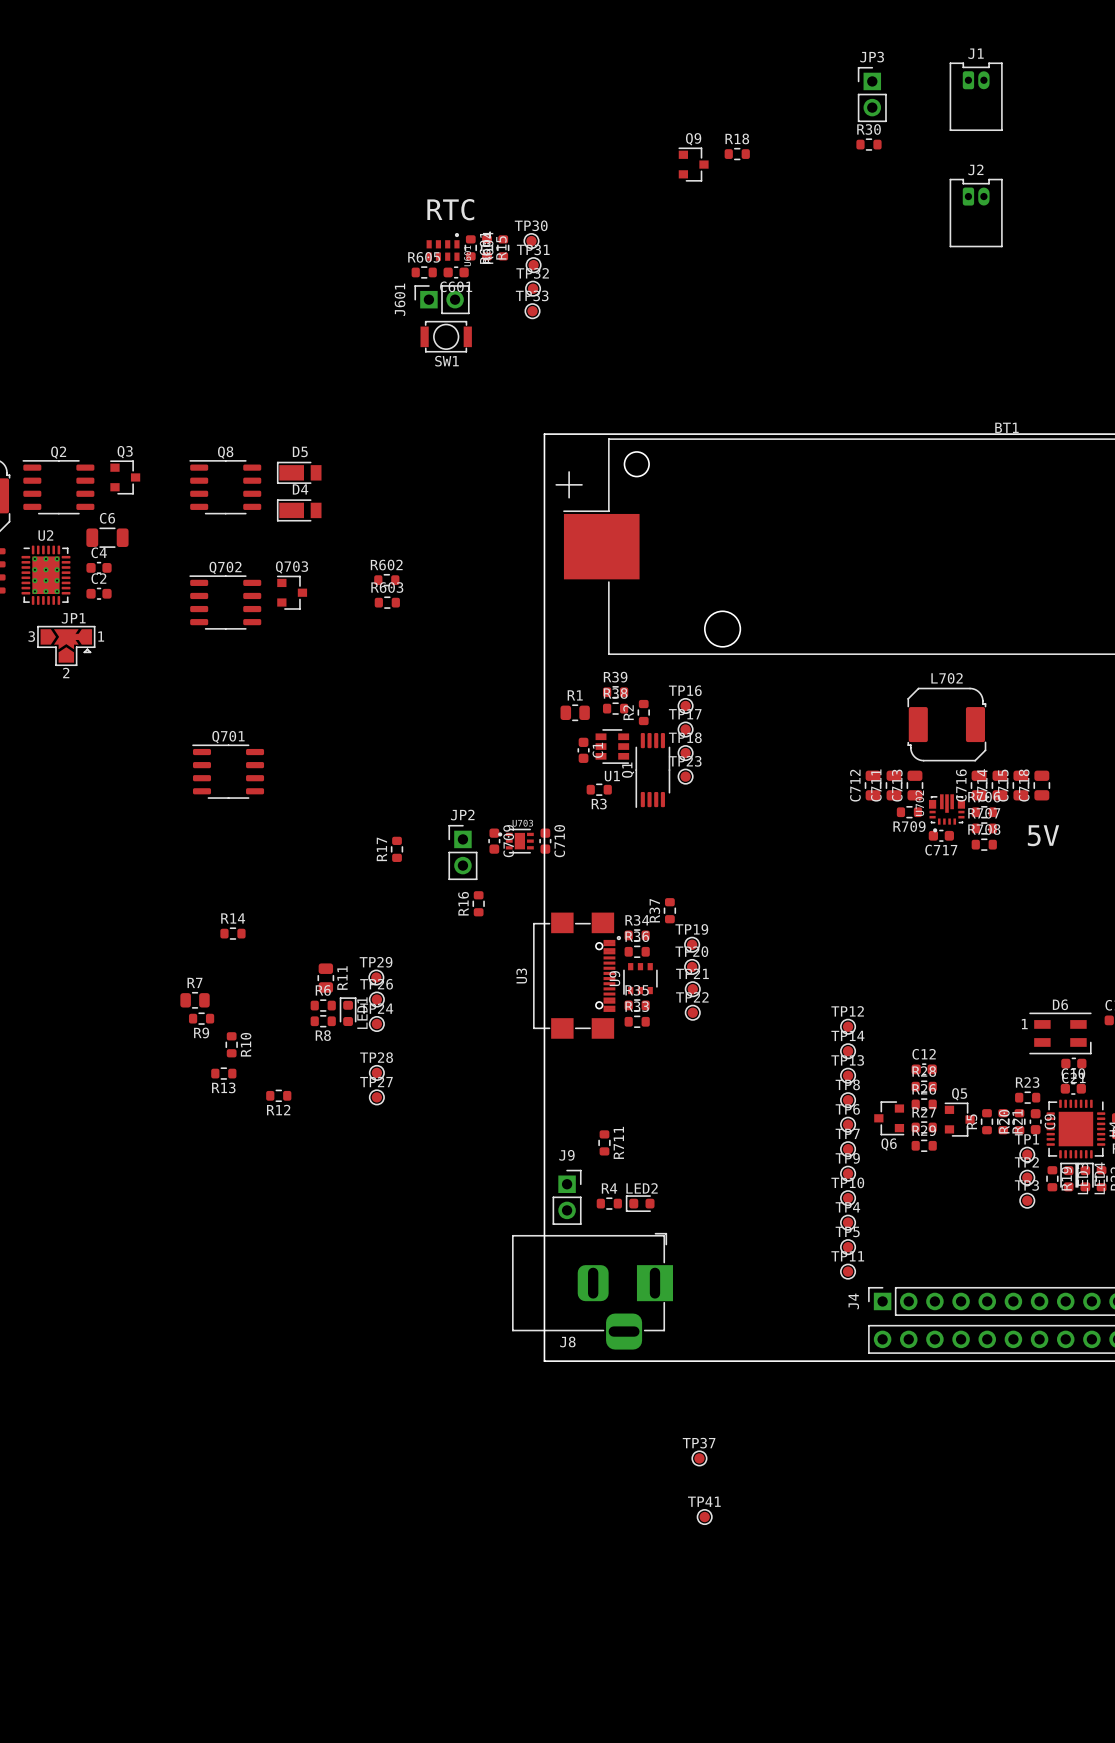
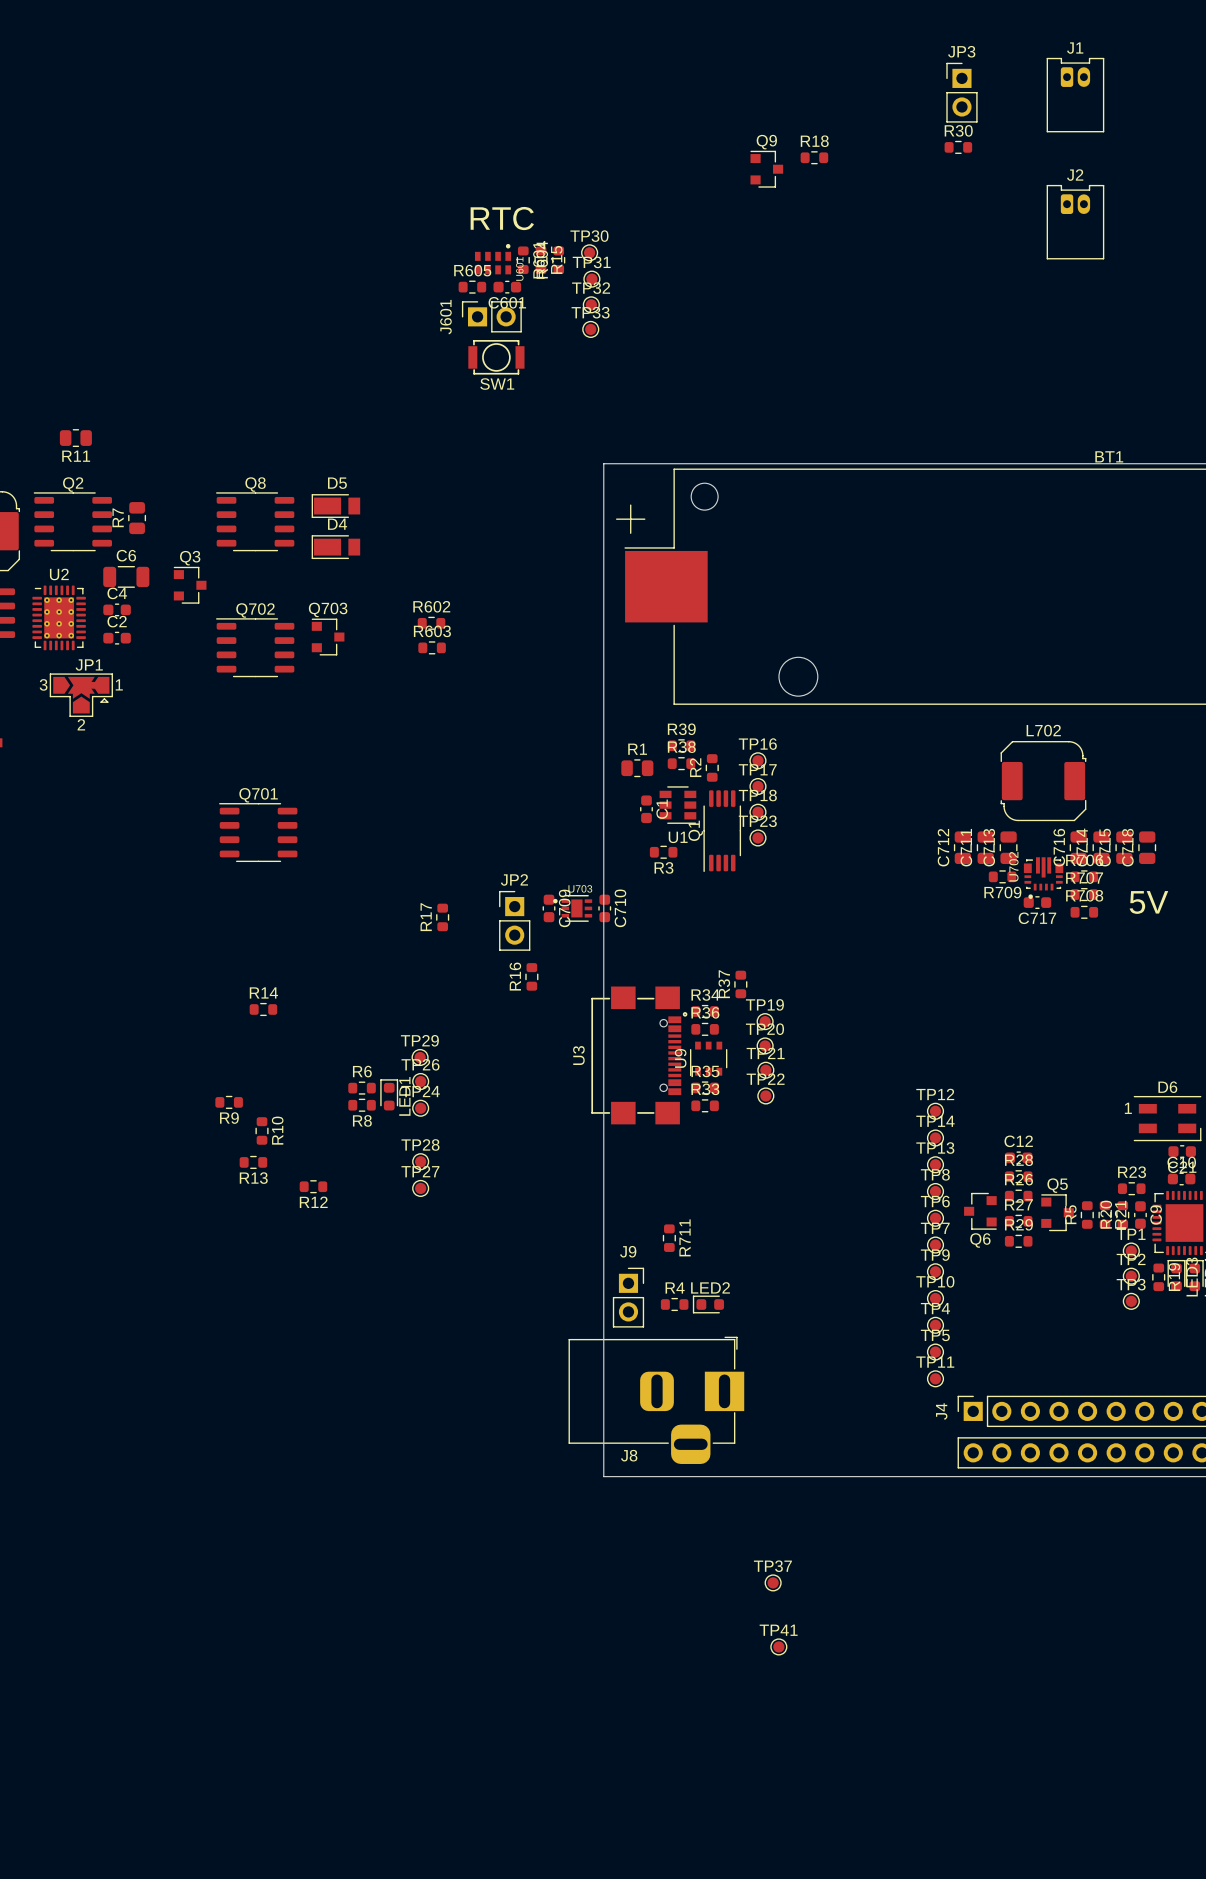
Q3 position: (125, 477) -> (190, 585)
R11 rotation: 0° (325, 978) -> 90° clockwise (75, 438)
R11 position: (325, 978) -> (75, 438)
R7 name position: R7 (195, 982) -> R7 (118, 517)
R7 rotation: 0° (195, 1000) -> 90° clockwise (137, 518)
R7 position: (195, 1000) -> (137, 518)

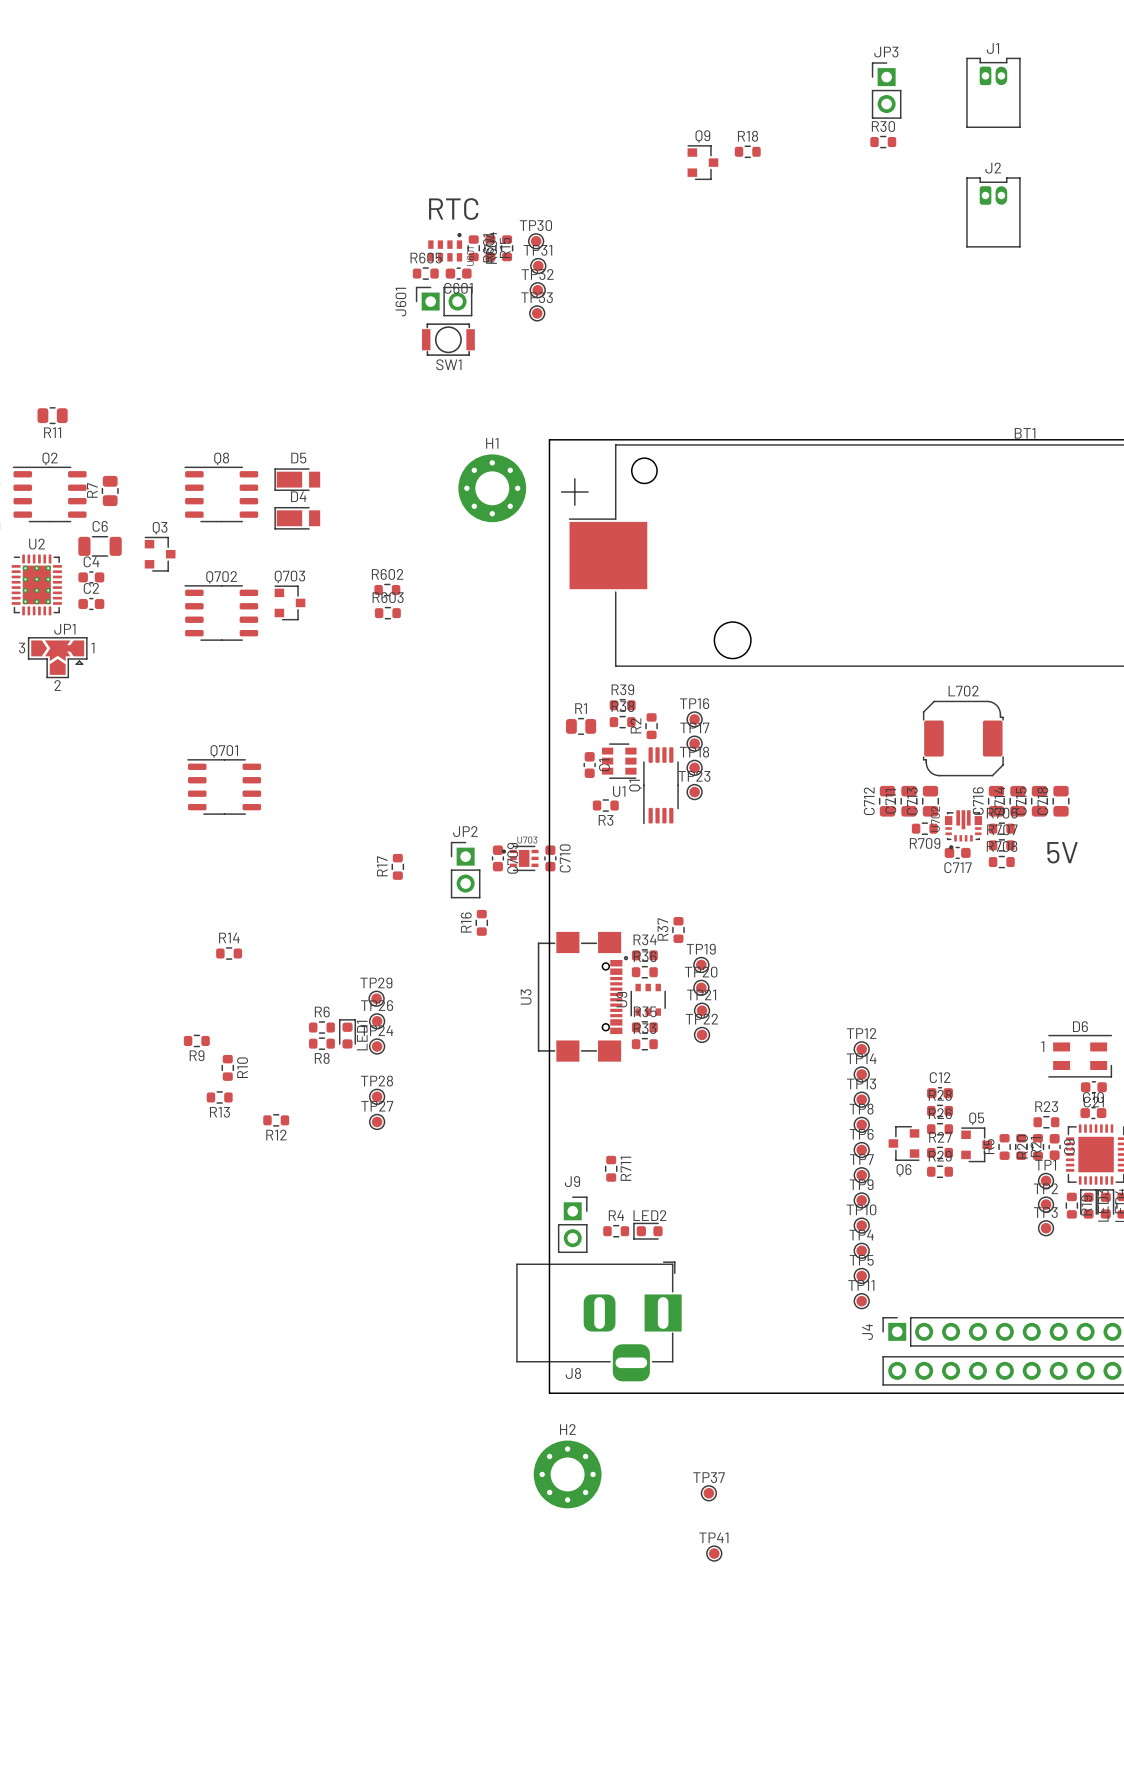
H1: none -> (492, 488)
H2: none -> (567, 1474)

